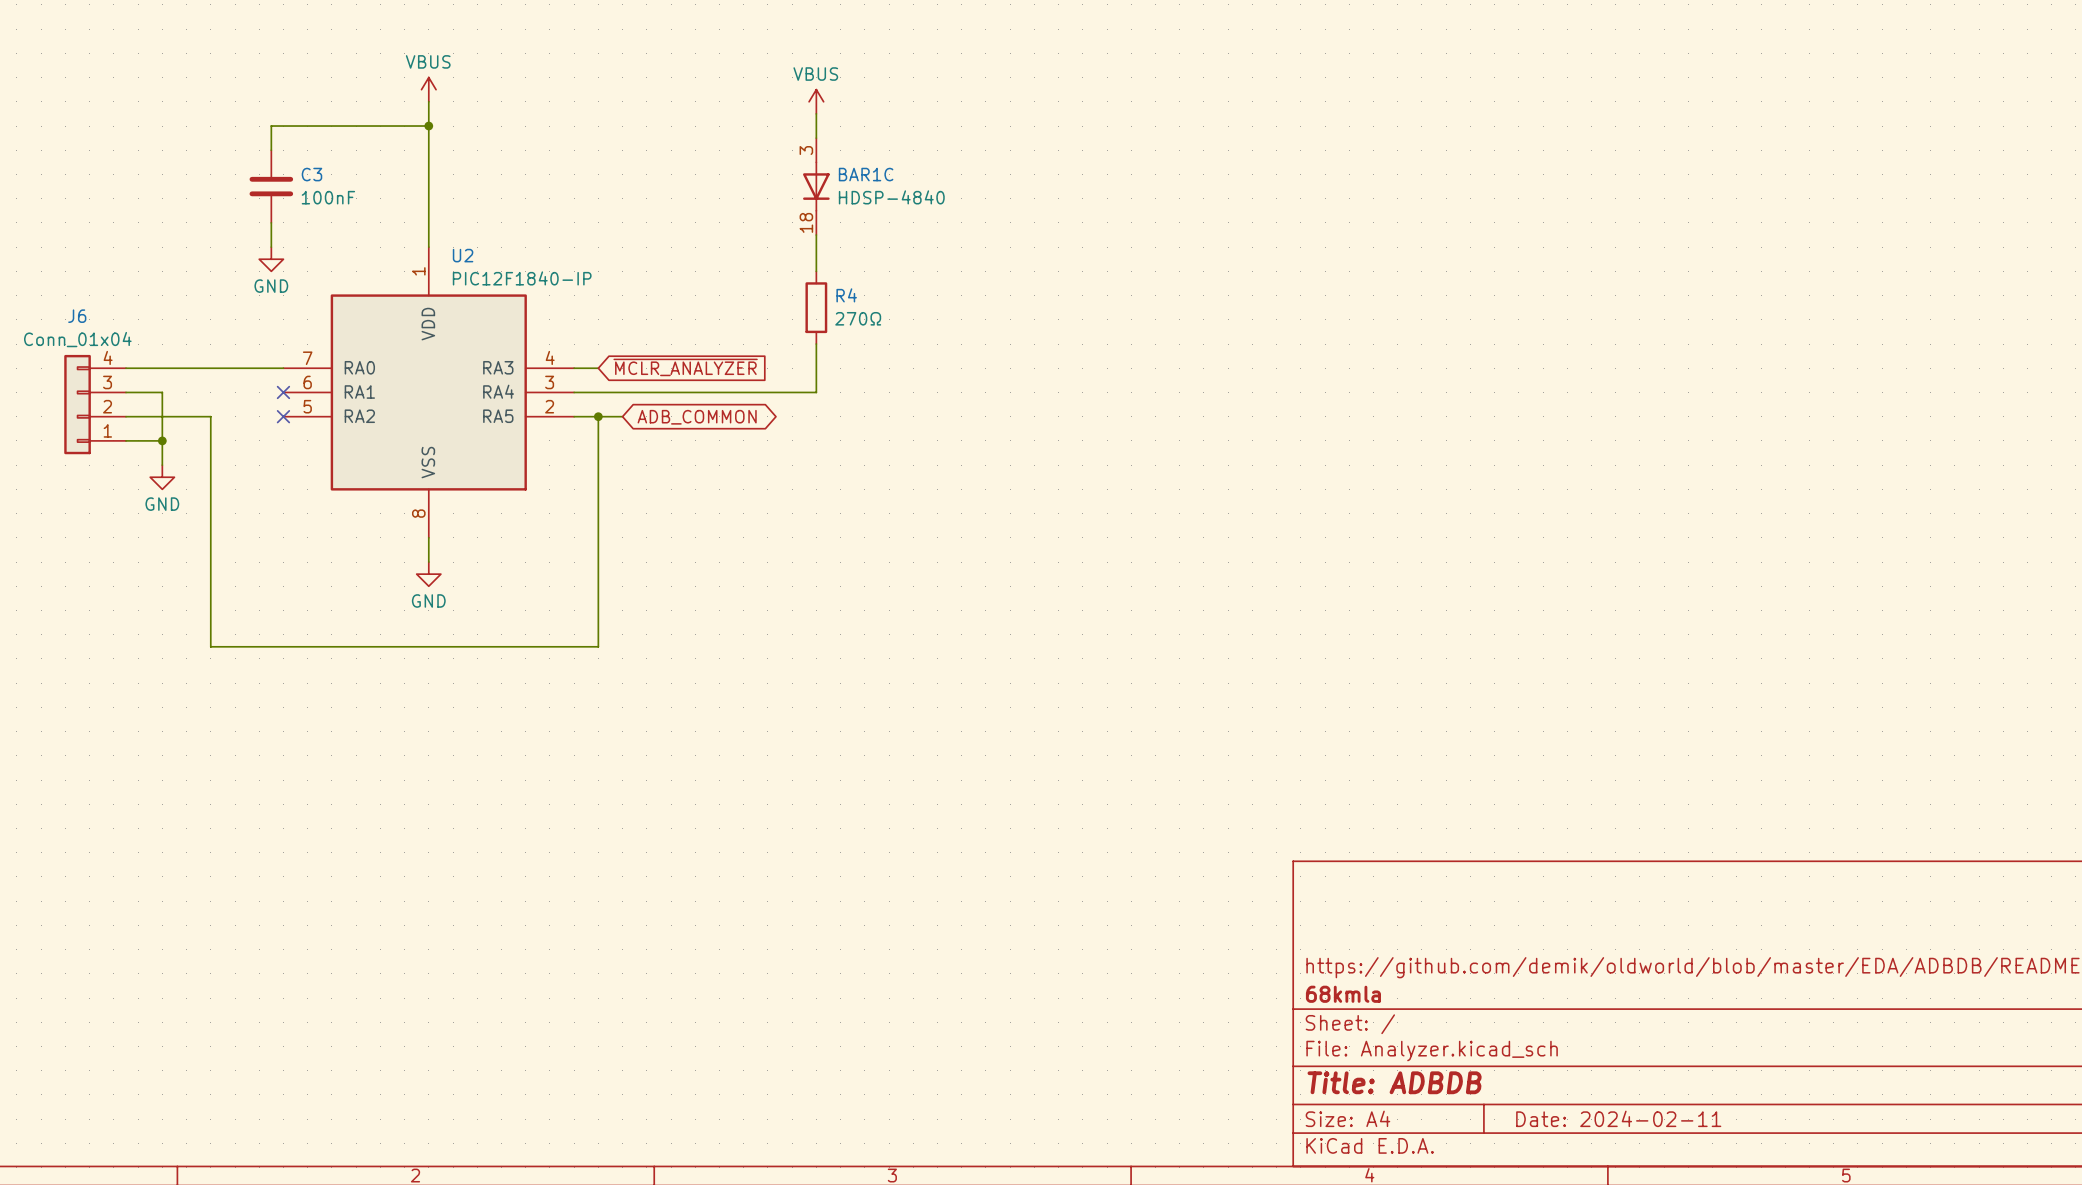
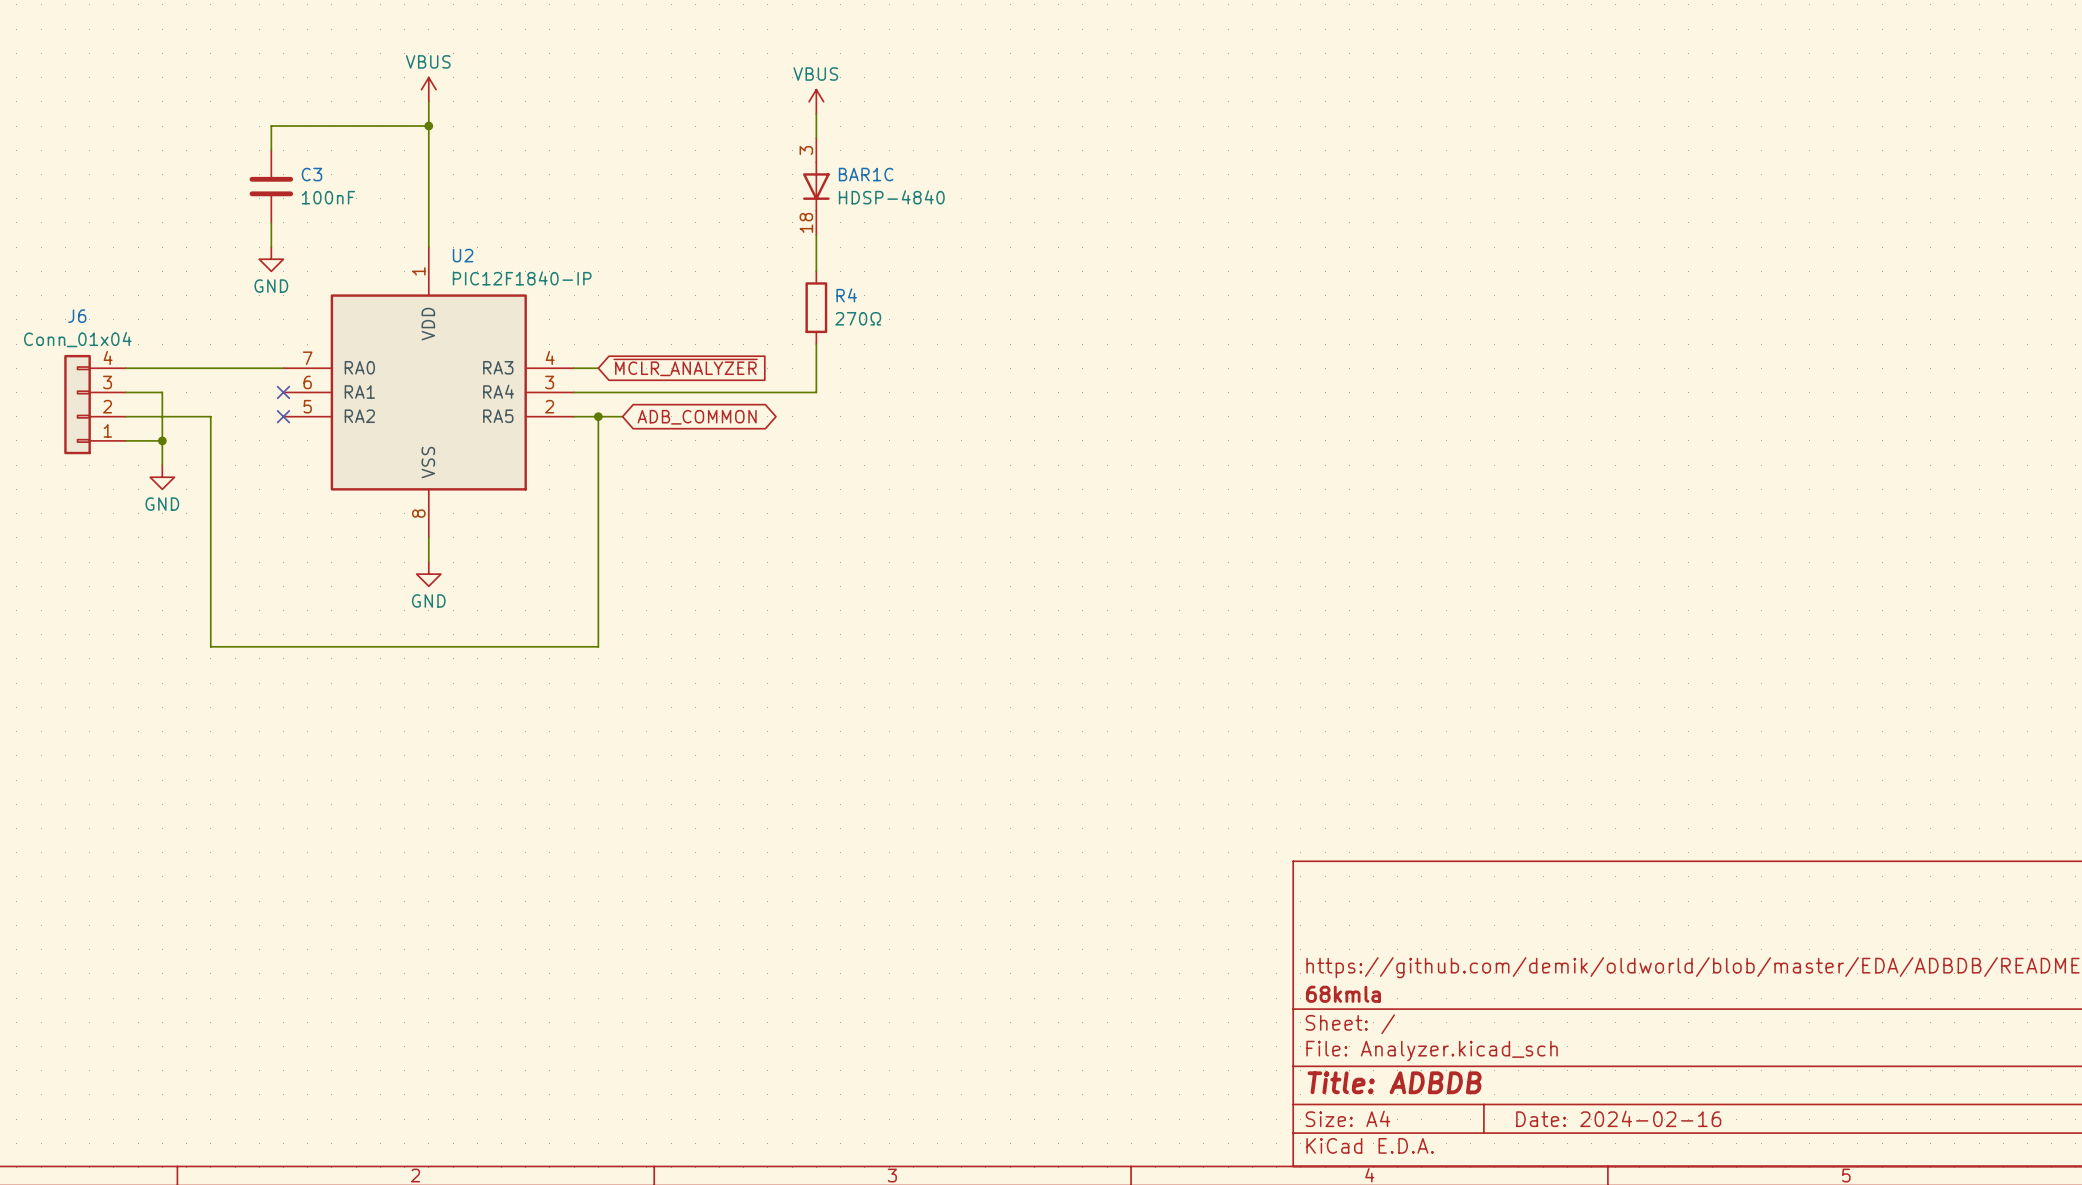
title block: Date: 2024-02-11 (1618, 1118) -> Date: 2024-02-16 (1618, 1118)

